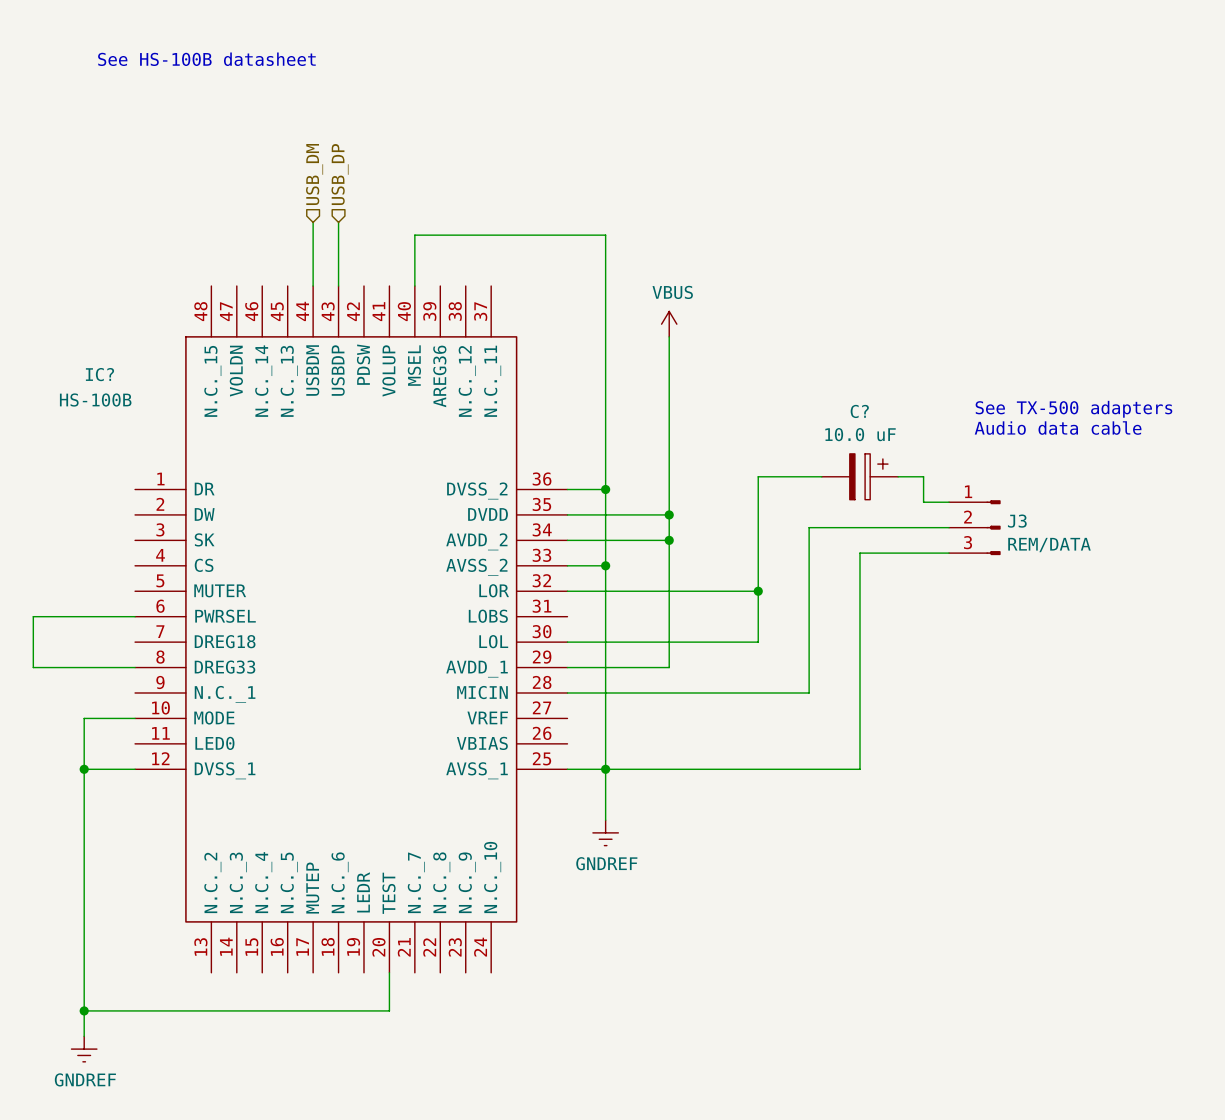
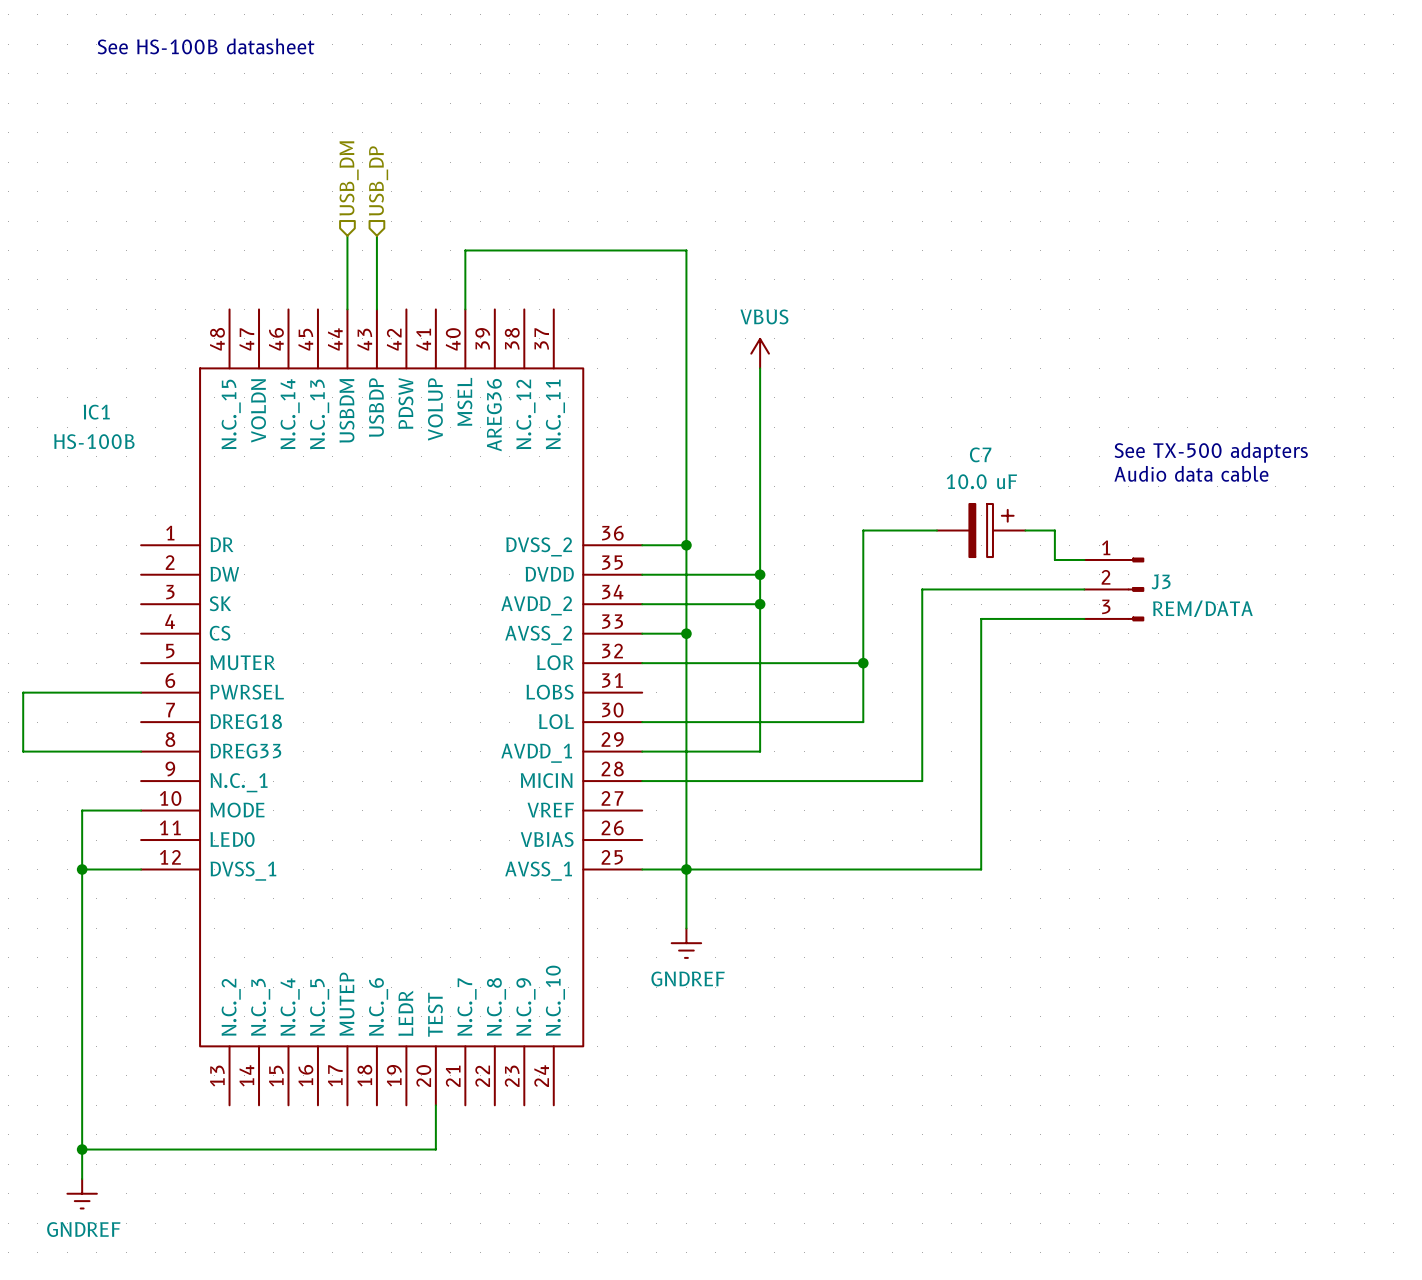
IC? name: IC? (99, 374) -> IC1 (96, 412)
C? name: C? (859, 411) -> C7 (980, 454)

